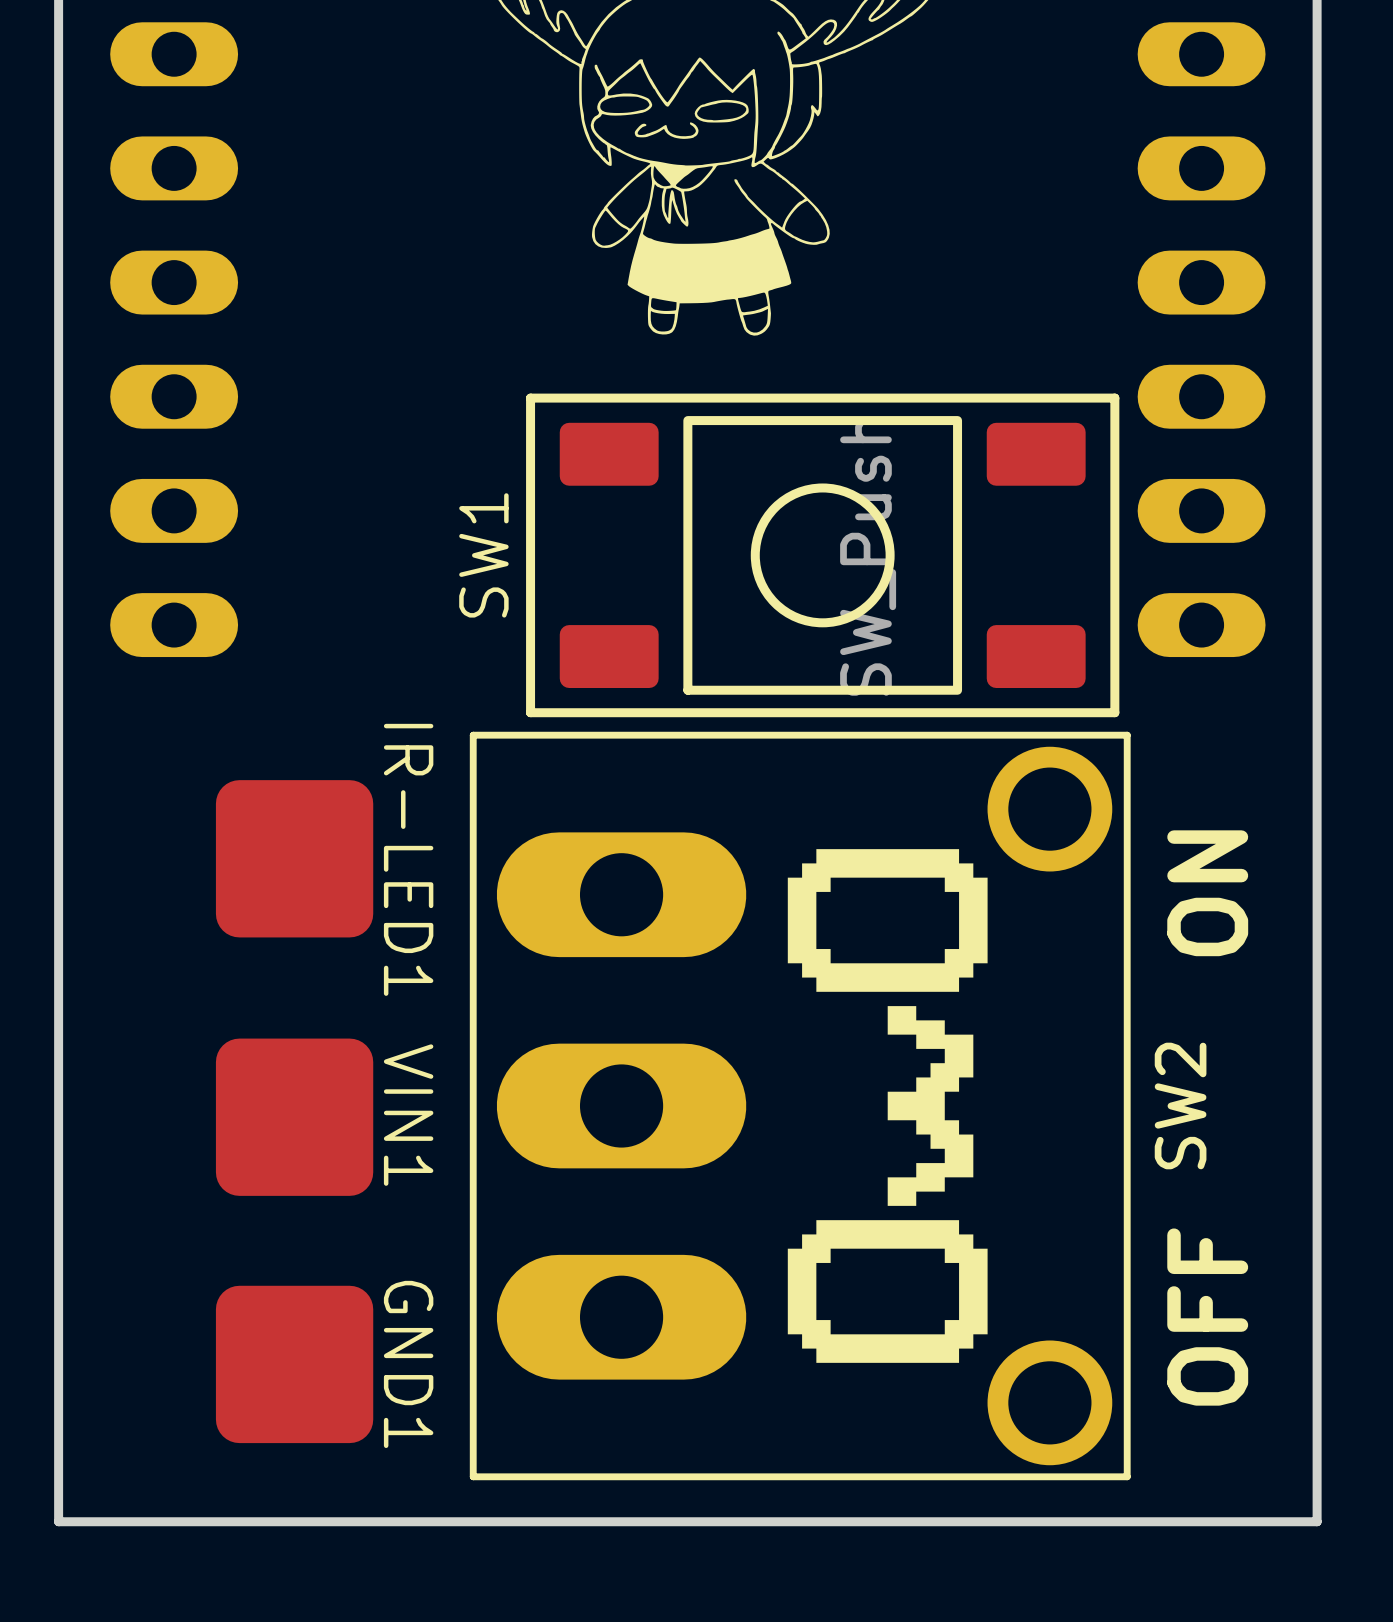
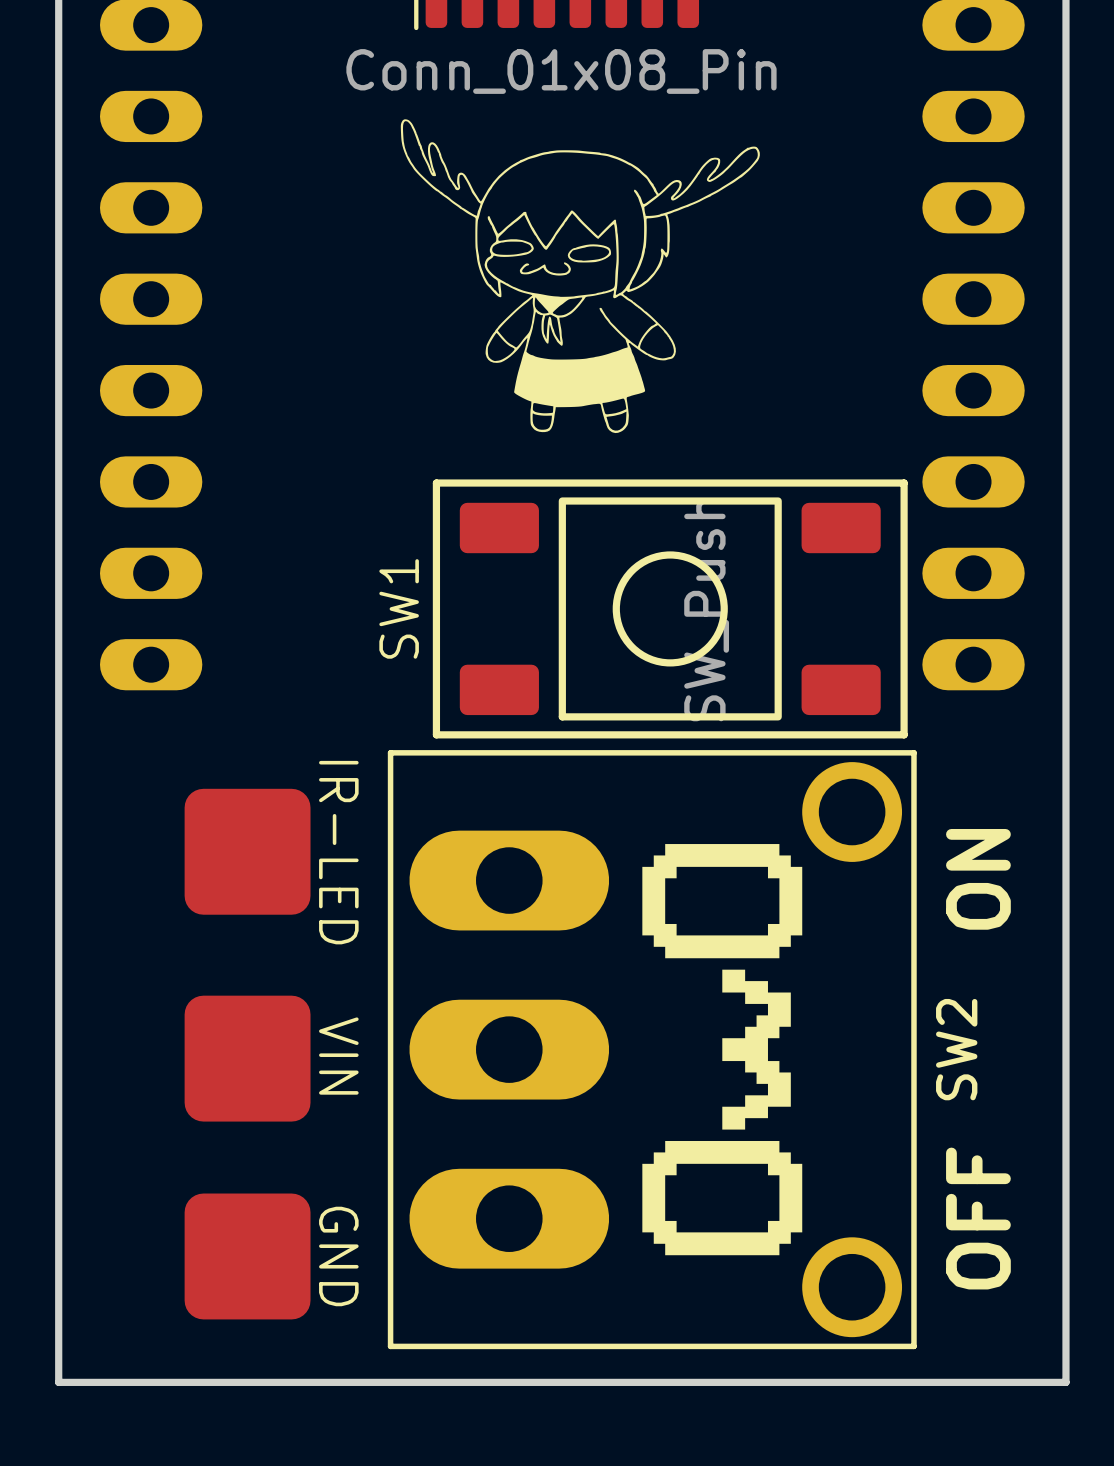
IR-LED1 name: IR-LED1 (408, 859) -> IR-LED (338, 852)
VIN1 name: VIN1 (408, 1115) -> VIN (338, 1056)
GND1 name: GND1 (408, 1364) -> GND (338, 1256)

